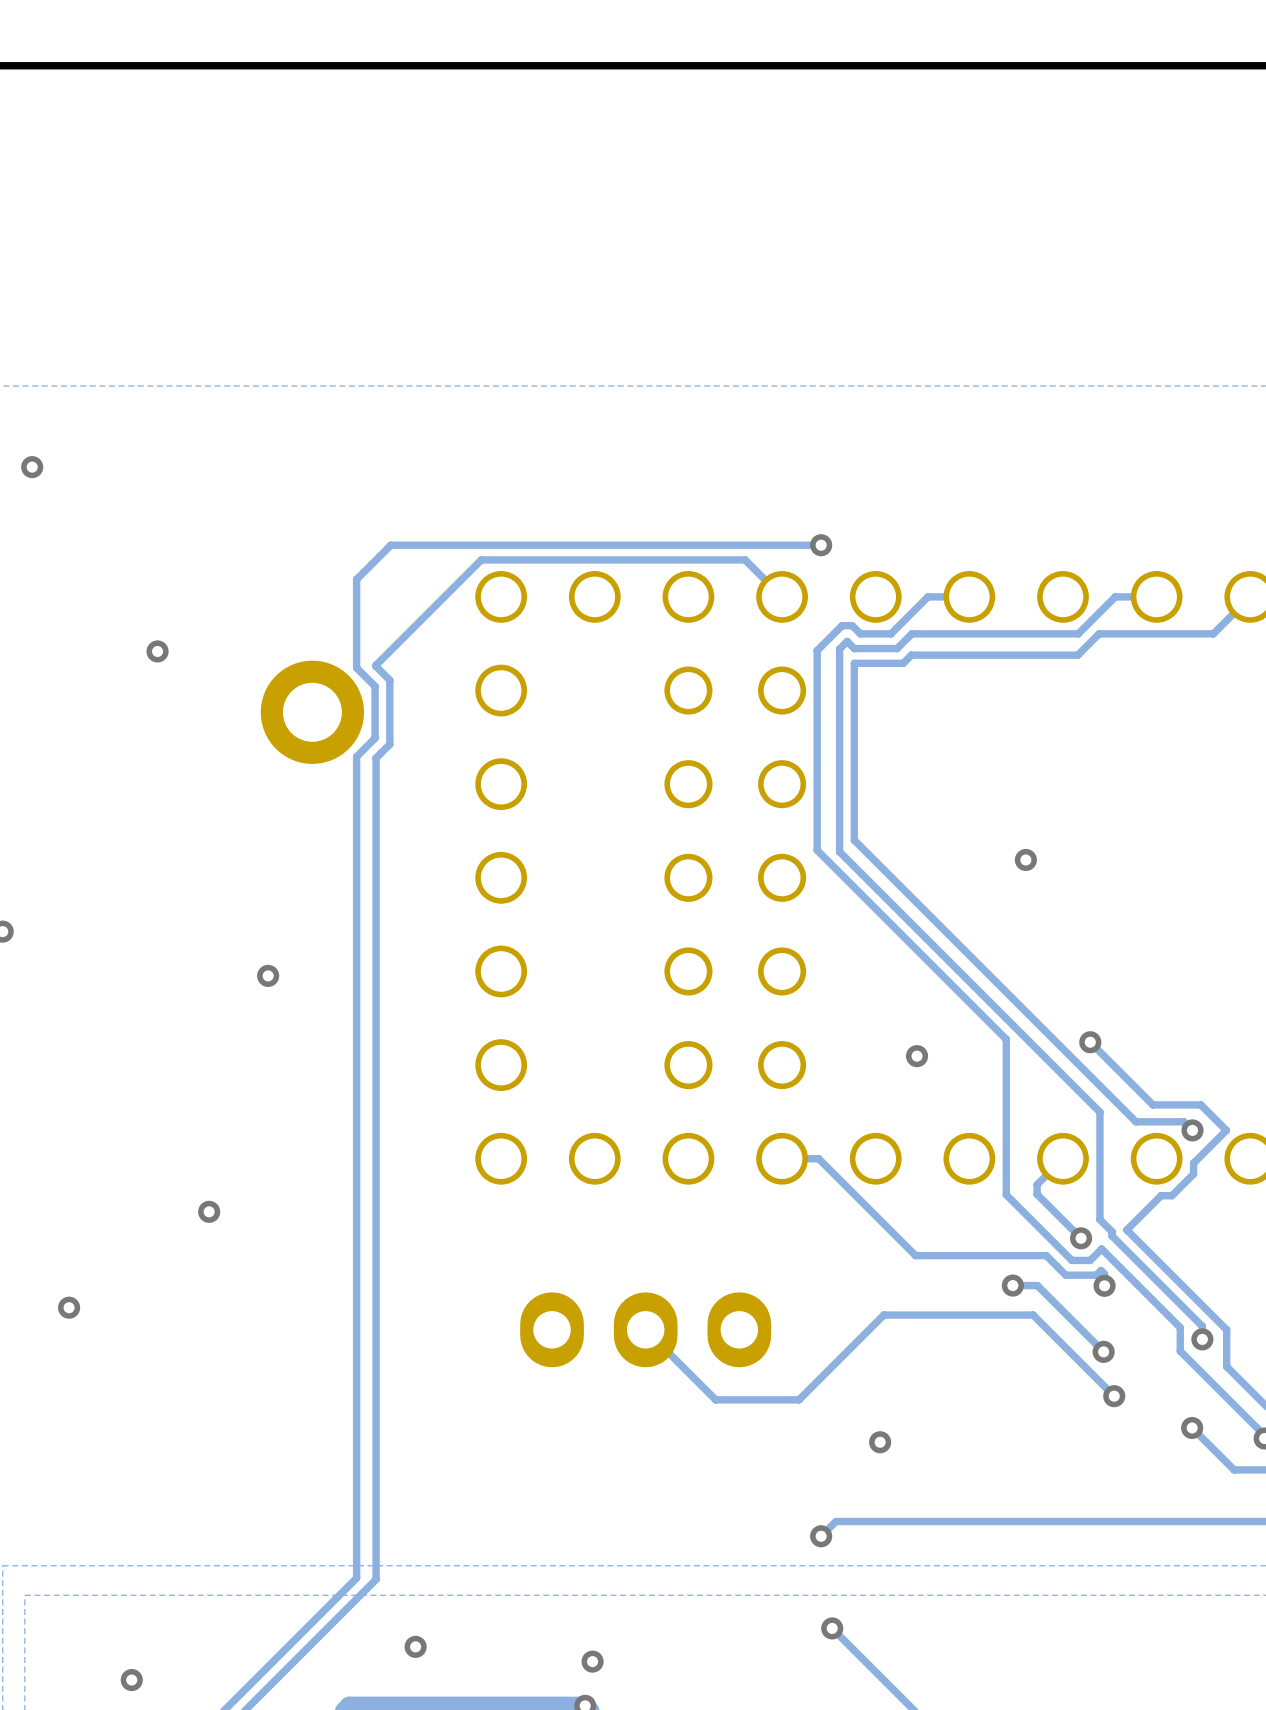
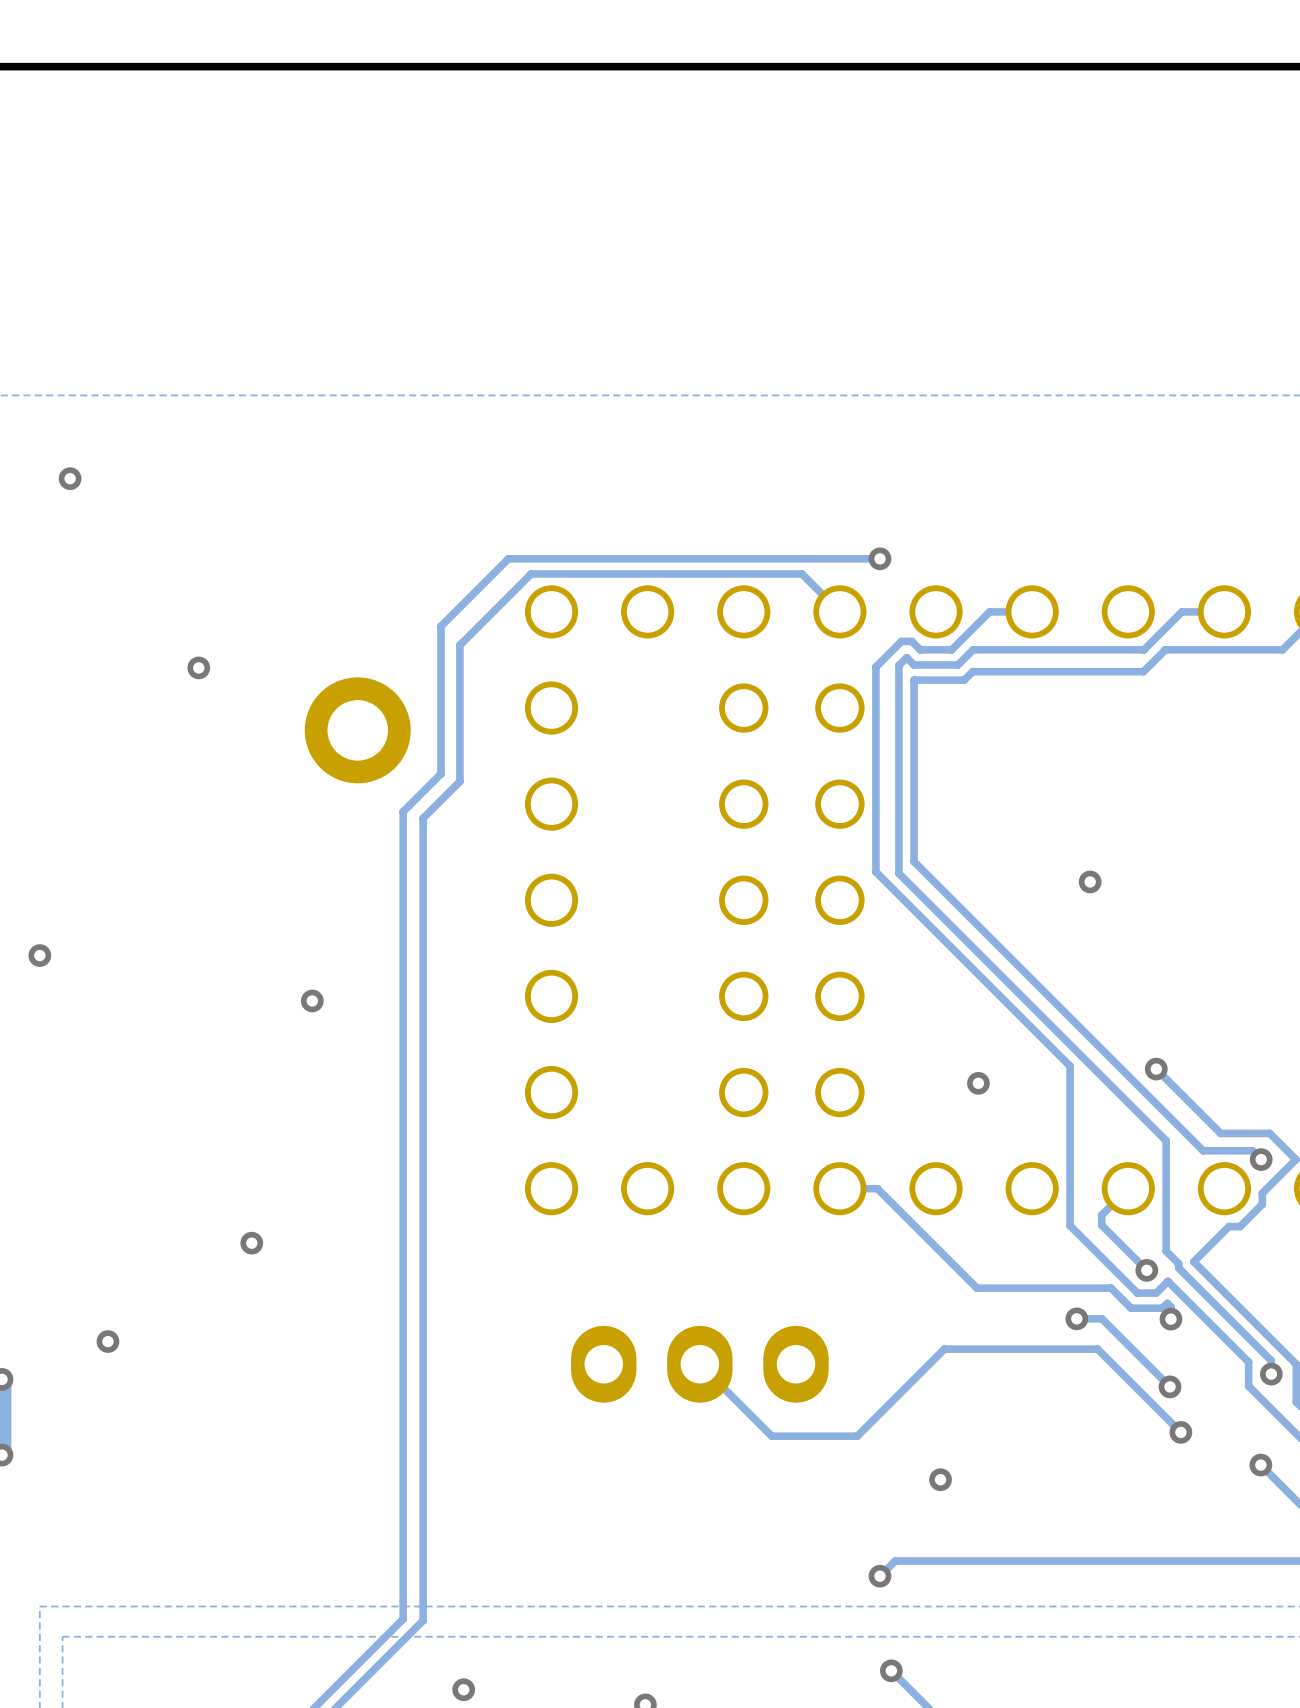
track: (459, 545) (390, 545) (356, 579) (356, 667) (375, 686) (375, 738) (356, 756) (356, 791) -> (508, 558) (441, 626) (441, 773) (403, 811)
track: (411, 629) (376, 665) (389, 680) (389, 744) (376, 758) (376, 797) -> (459, 645) (459, 781) (423, 818)

